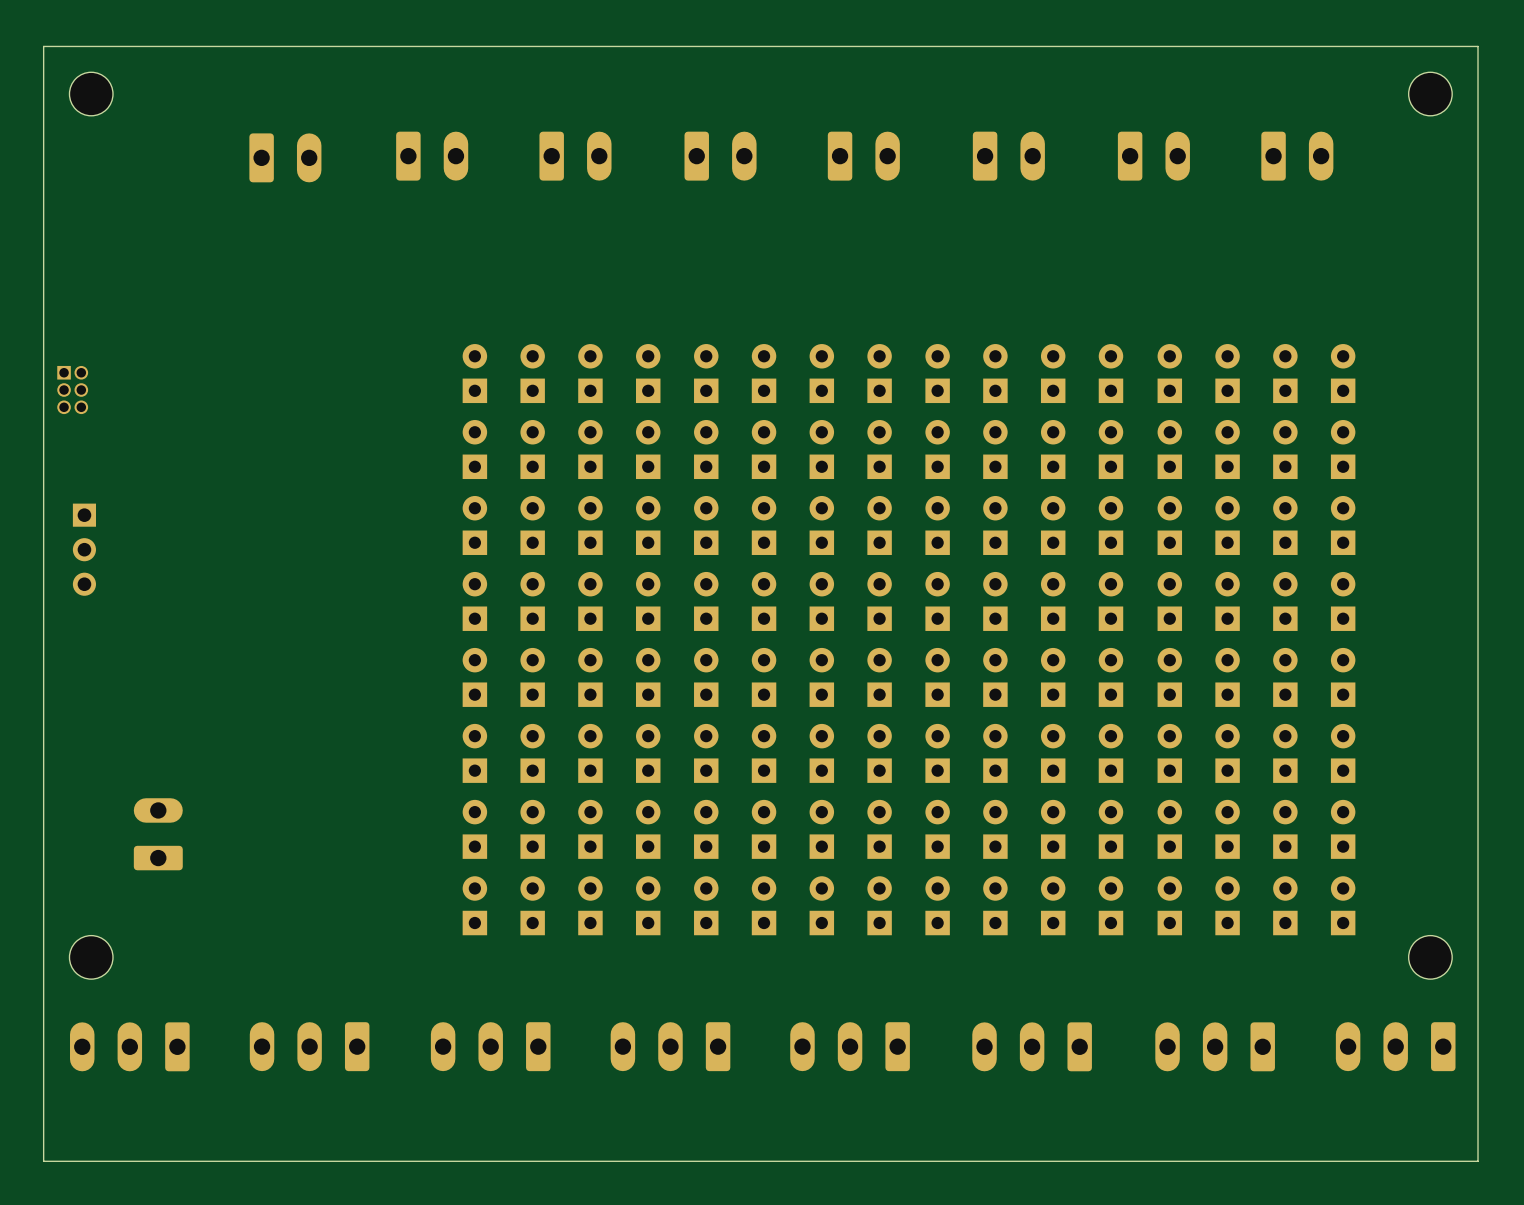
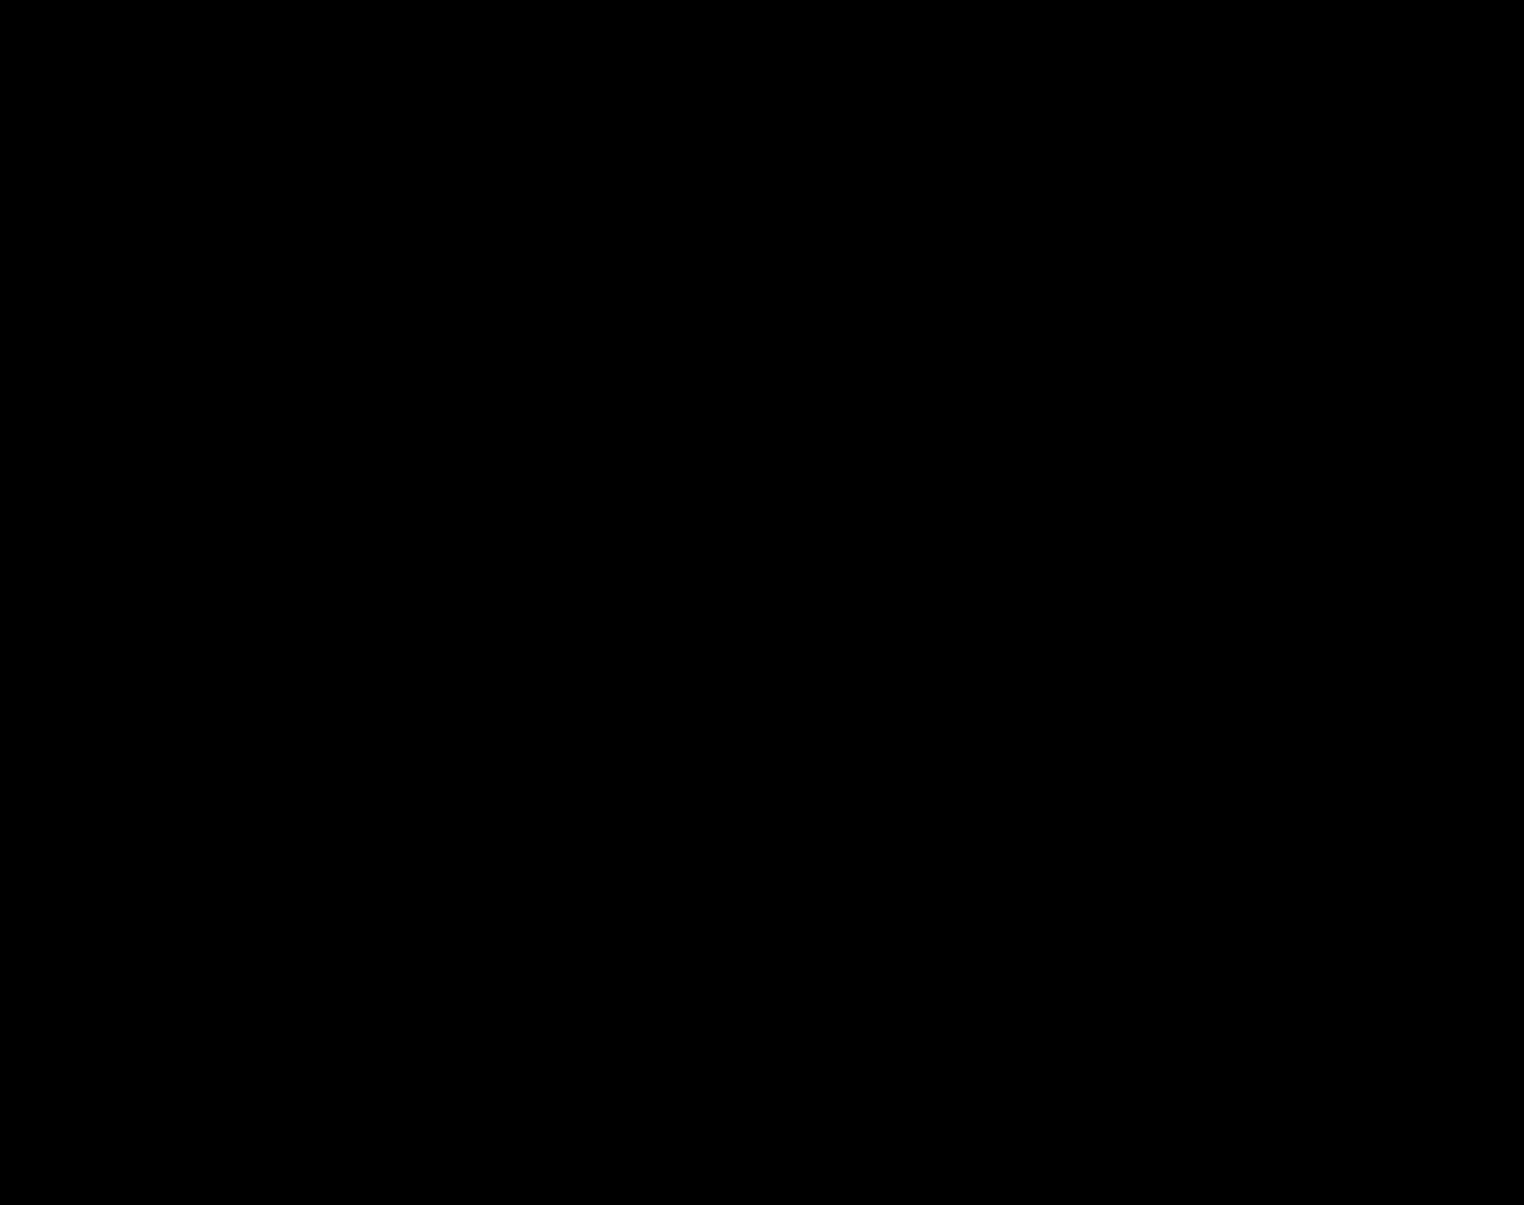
board edge: (1478, 46) (43, 46) (43, 1161) (1478, 1161) (1478, 46) -> none
part: (91, 94) -> none
part: (1430, 94) -> none
part: (432, 156) -> none
part: (575, 156) -> none
part: (720, 156) -> none
part: (863, 156) -> none
part: (1008, 156) -> none
part: (1153, 156) -> none
part: (1297, 156) -> none
part: (285, 157) -> none
part: (474, 373) -> none
part: (532, 373) -> none
part: (590, 373) -> none
part: (648, 373) -> none
part: (706, 373) -> none
part: (764, 373) -> none
part: (821, 373) -> none
part: (879, 373) -> none
part: (937, 373) -> none
part: (995, 373) -> none
part: (1053, 373) -> none
part: (1110, 373) -> none
part: (1169, 373) -> none
part: (1227, 373) -> none
part: (1285, 373) -> none
part: (1343, 373) -> none
part: (72, 390) -> none
part: (474, 449) -> none
part: (532, 449) -> none
part: (590, 449) -> none
part: (648, 449) -> none
part: (706, 449) -> none
part: (764, 449) -> none
part: (821, 449) -> none
part: (879, 449) -> none
part: (937, 449) -> none
part: (995, 449) -> none
part: (1053, 449) -> none
part: (1110, 449) -> none
part: (1169, 449) -> none
part: (1227, 449) -> none
part: (1285, 449) -> none
part: (1343, 449) -> none
part: (474, 525) -> none
part: (532, 525) -> none
part: (590, 525) -> none
part: (648, 525) -> none
part: (706, 525) -> none
part: (764, 525) -> none
part: (821, 525) -> none
part: (879, 525) -> none
part: (937, 525) -> none
part: (995, 525) -> none
part: (1053, 525) -> none
part: (1110, 525) -> none
part: (1169, 525) -> none
part: (1227, 525) -> none
part: (1285, 525) -> none
part: (1343, 525) -> none
part: (84, 549) -> none
part: (474, 601) -> none
part: (532, 601) -> none
part: (590, 601) -> none
part: (648, 601) -> none
part: (706, 601) -> none
part: (764, 601) -> none
part: (821, 601) -> none
part: (879, 601) -> none
part: (937, 601) -> none
part: (995, 601) -> none
part: (1053, 601) -> none
part: (1110, 601) -> none
part: (1169, 601) -> none
part: (1227, 601) -> none
part: (1285, 601) -> none
part: (1343, 601) -> none
part: (474, 677) -> none
part: (532, 677) -> none
part: (590, 677) -> none
part: (648, 677) -> none
part: (706, 677) -> none
part: (764, 677) -> none
part: (821, 677) -> none
part: (879, 677) -> none
part: (937, 677) -> none
part: (995, 677) -> none
part: (1053, 677) -> none
part: (1110, 677) -> none
part: (1169, 677) -> none
part: (1227, 677) -> none
part: (1285, 677) -> none
part: (1343, 677) -> none
part: (474, 753) -> none
part: (532, 753) -> none
part: (590, 753) -> none
part: (648, 753) -> none
part: (706, 753) -> none
part: (764, 753) -> none
part: (821, 753) -> none
part: (879, 753) -> none
part: (937, 753) -> none
part: (995, 753) -> none
part: (1053, 753) -> none
part: (1110, 753) -> none
part: (1169, 753) -> none
part: (1227, 753) -> none
part: (1285, 753) -> none
part: (1343, 753) -> none
part: (474, 829) -> none
part: (532, 829) -> none
part: (590, 829) -> none
part: (648, 829) -> none
part: (706, 829) -> none
part: (764, 829) -> none
part: (821, 829) -> none
part: (879, 829) -> none
part: (937, 829) -> none
part: (995, 829) -> none
part: (1053, 829) -> none
part: (1110, 829) -> none
part: (1169, 829) -> none
part: (1227, 829) -> none
part: (1285, 829) -> none
part: (1343, 829) -> none
part: (158, 834) -> none
part: (474, 905) -> none
part: (532, 905) -> none
part: (590, 905) -> none
part: (648, 905) -> none
part: (706, 905) -> none
part: (764, 905) -> none
part: (821, 905) -> none
part: (879, 905) -> none
part: (937, 905) -> none
part: (995, 905) -> none
part: (1053, 905) -> none
part: (1110, 905) -> none
part: (1169, 905) -> none
part: (1227, 905) -> none
part: (1285, 905) -> none
part: (1343, 905) -> none
part: (91, 957) -> none
part: (1430, 957) -> none
part: (129, 1046) -> none
part: (309, 1046) -> none
part: (490, 1046) -> none
part: (670, 1046) -> none
part: (850, 1046) -> none
part: (1032, 1046) -> none
part: (1215, 1046) -> none
part: (1395, 1046) -> none

